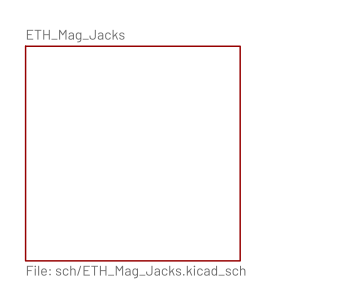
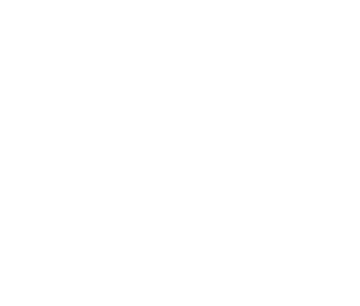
sheet ETH_Mag_Jacks: File: sch/ETH_Mag_Jacks.kicad_sch (132, 153) -> none

